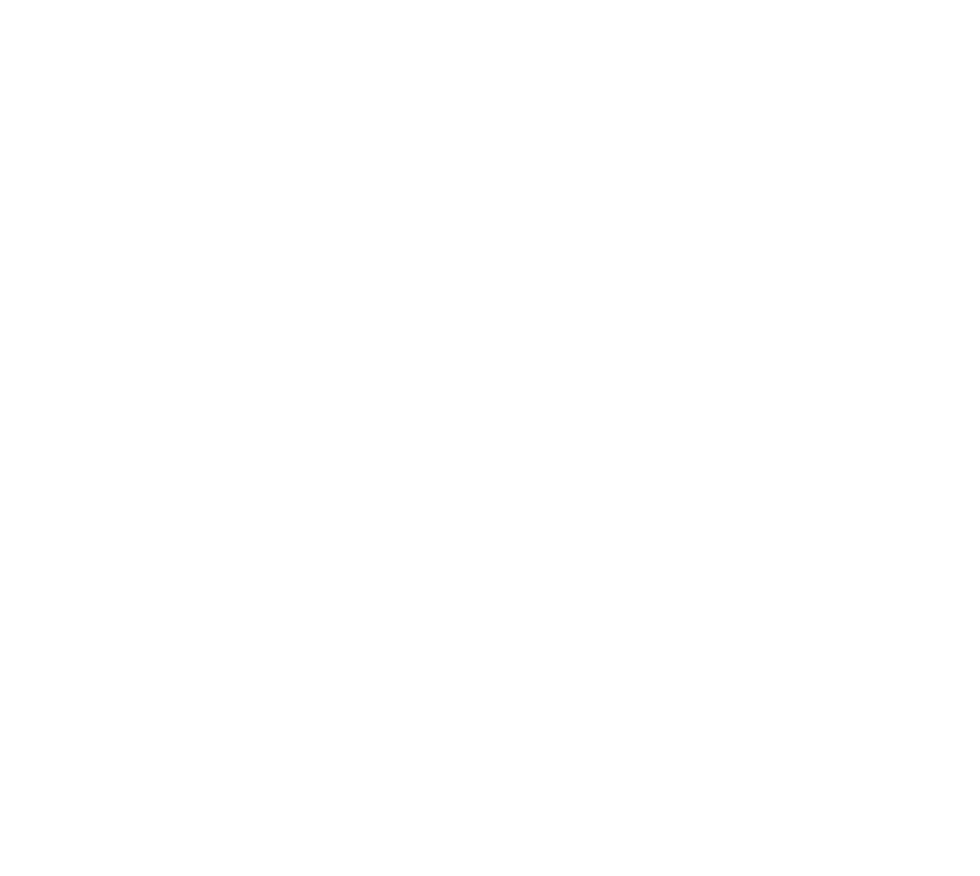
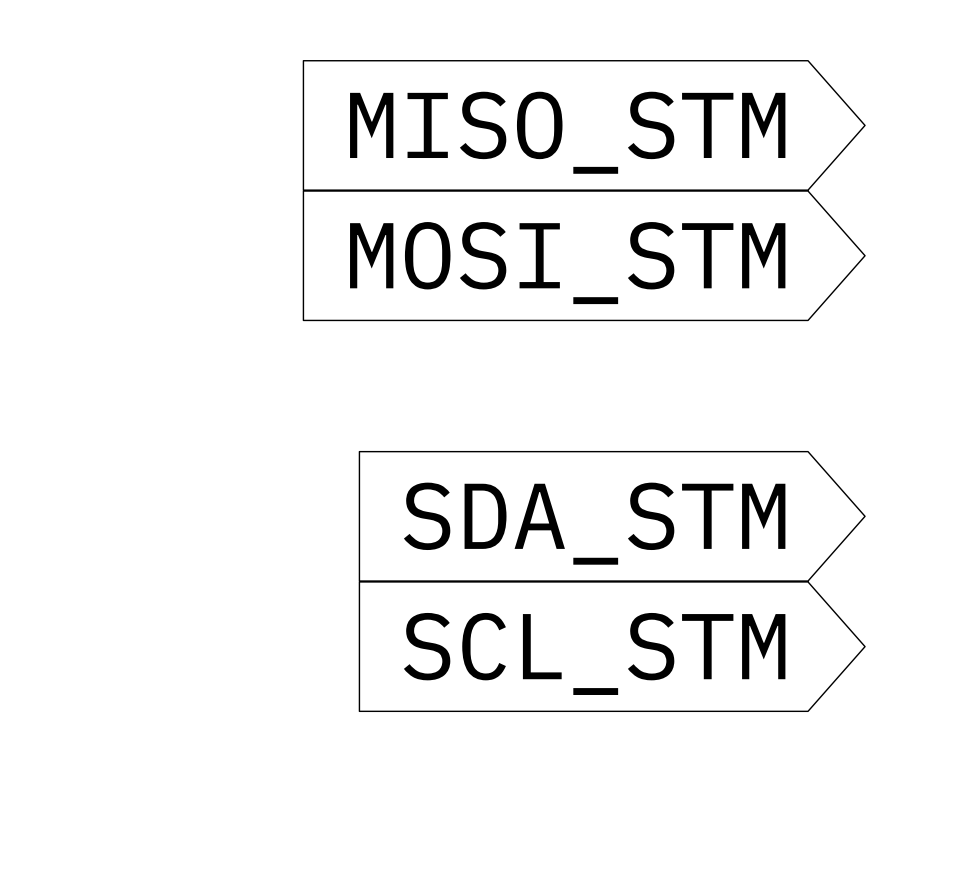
global label: none -> MISO_STM (567, 132)
global label: none -> MOSI_STM (567, 263)
global label: none -> SDA_STM (594, 523)
global label: none -> SCL_STM (594, 653)

